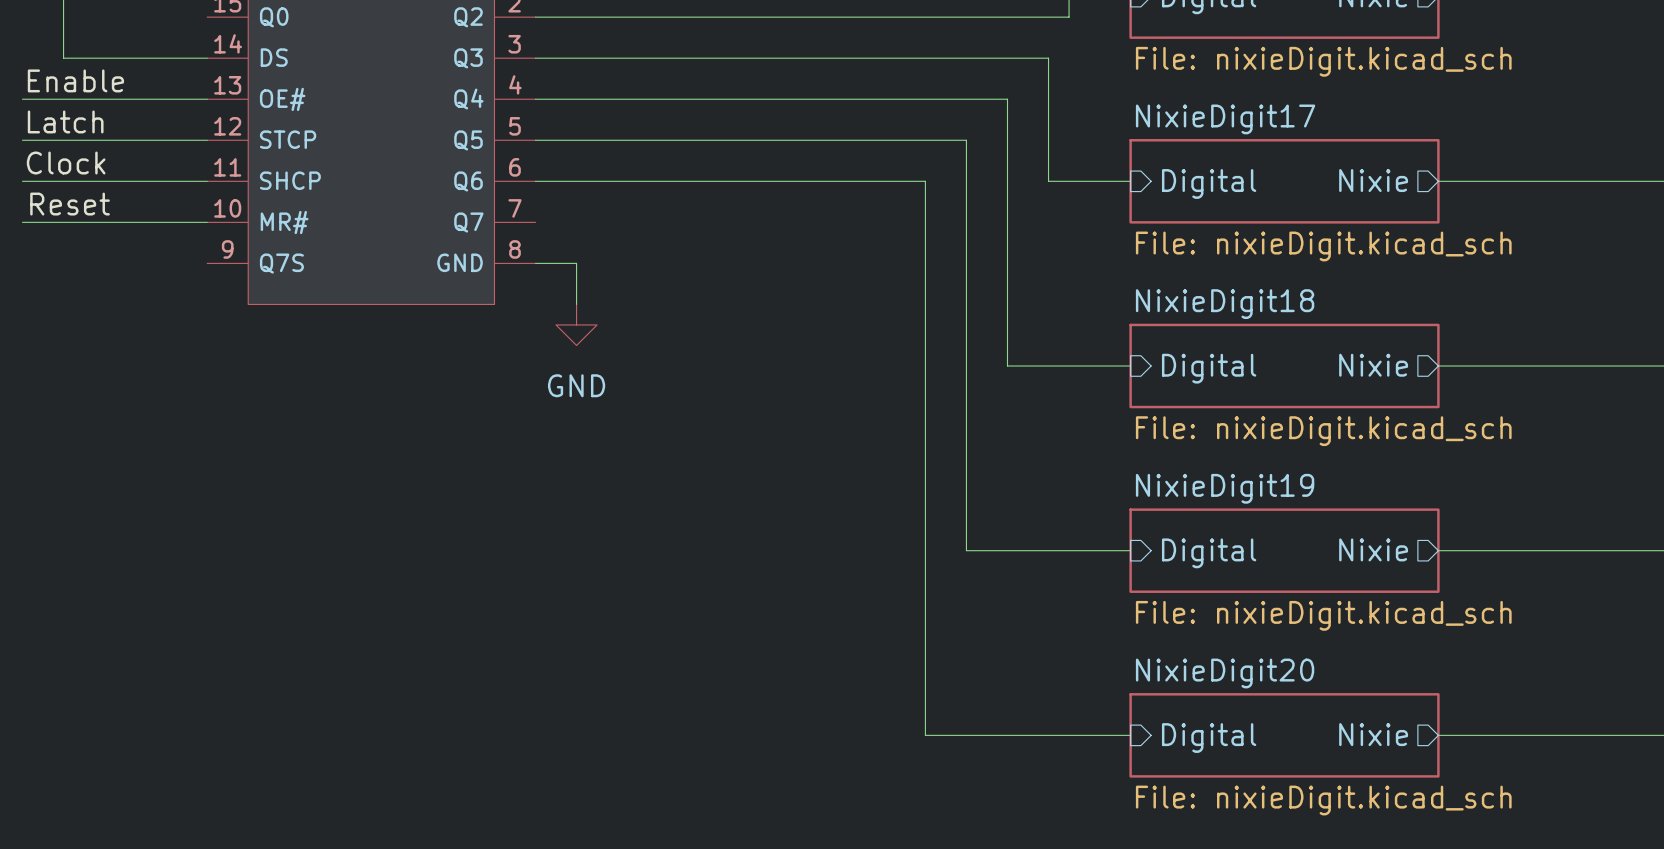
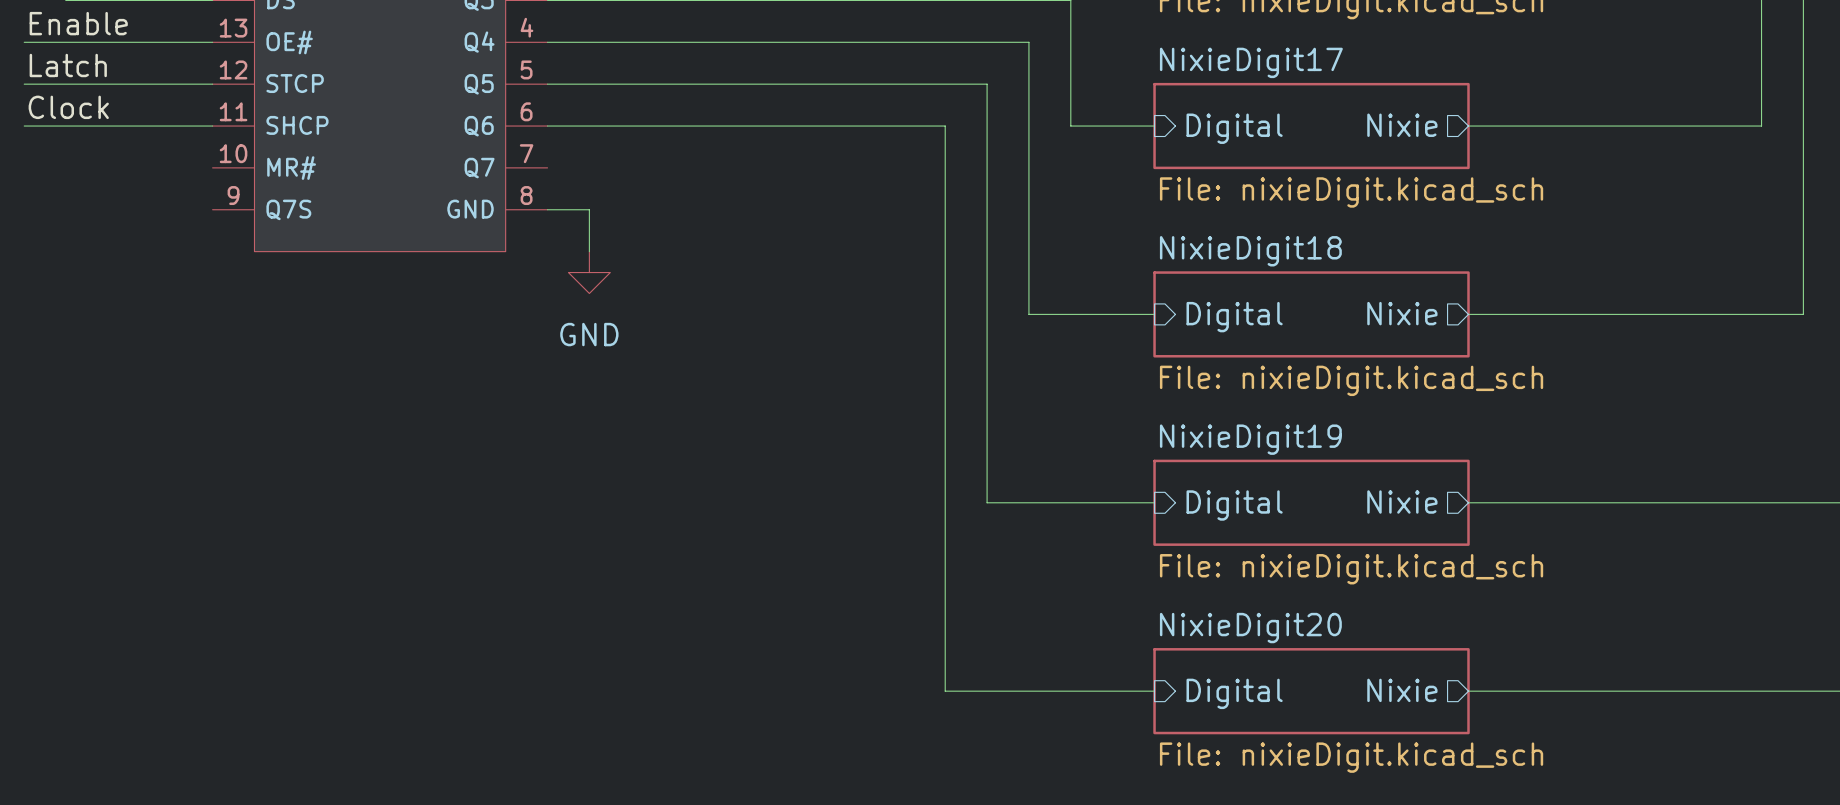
label: Reset (70, 204) -> none
wire: (22, 222) (207, 222) -> none

